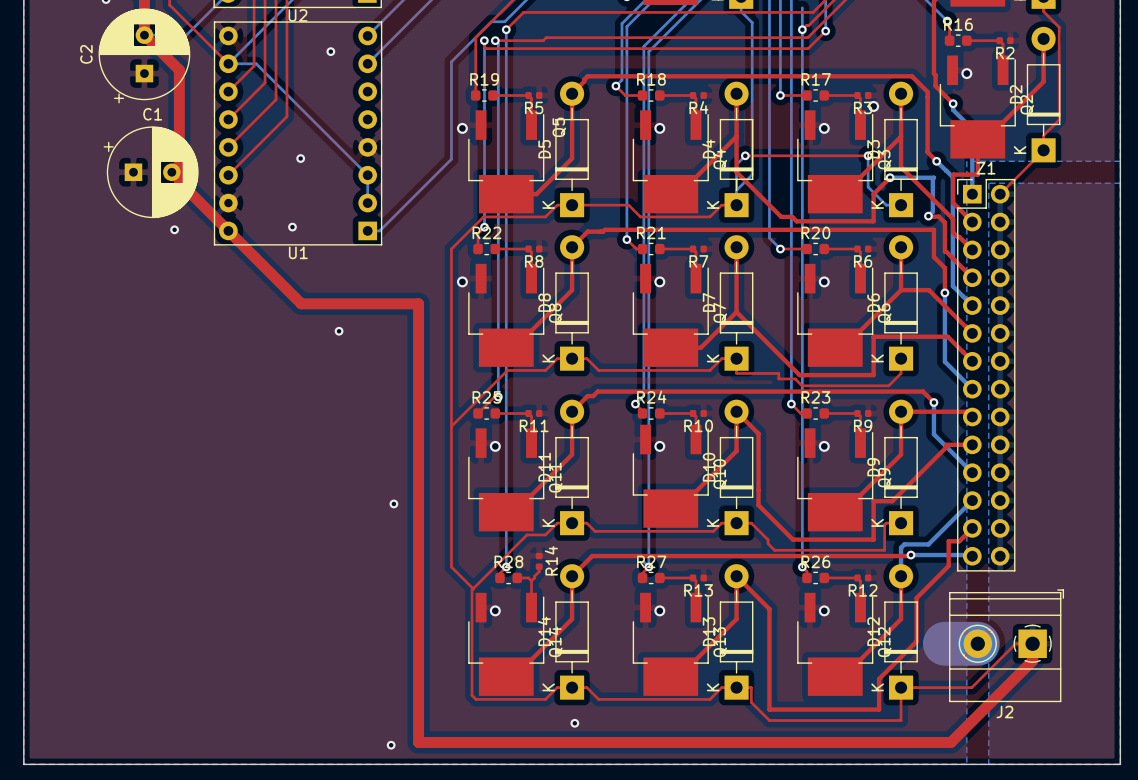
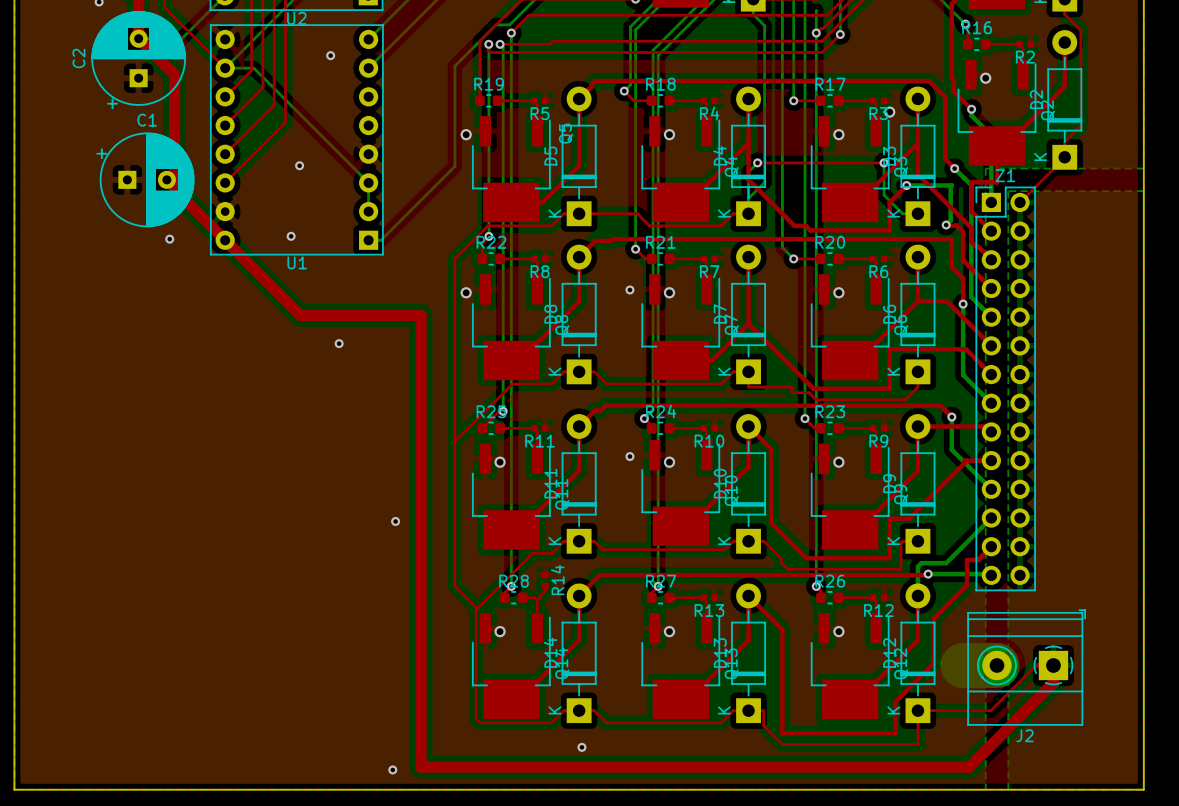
via: none -> (629, 289)
via: none -> (629, 456)

